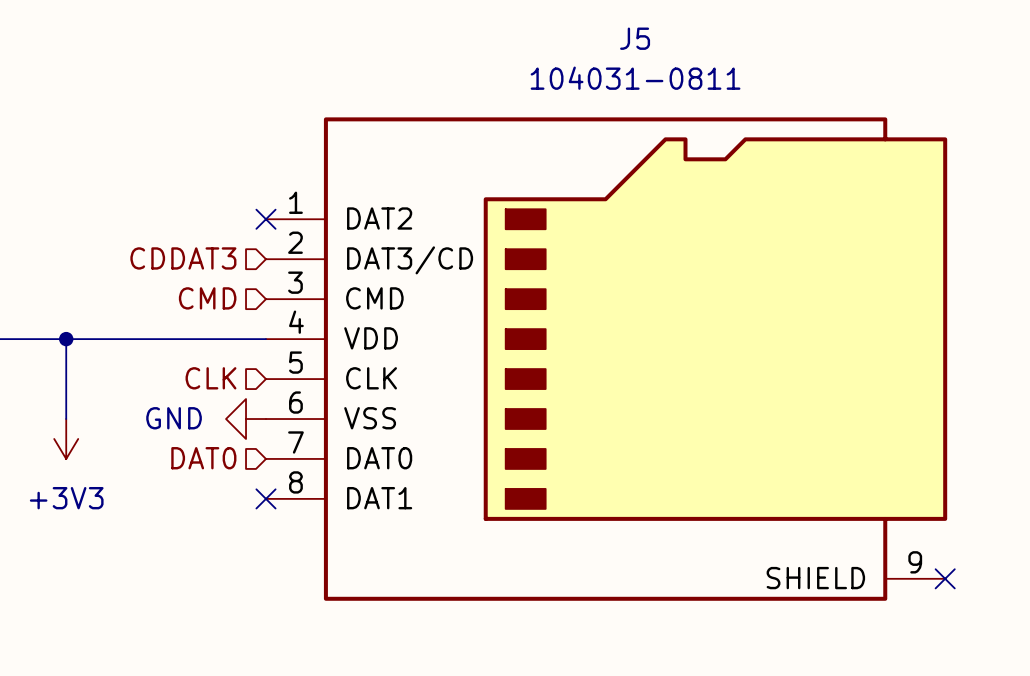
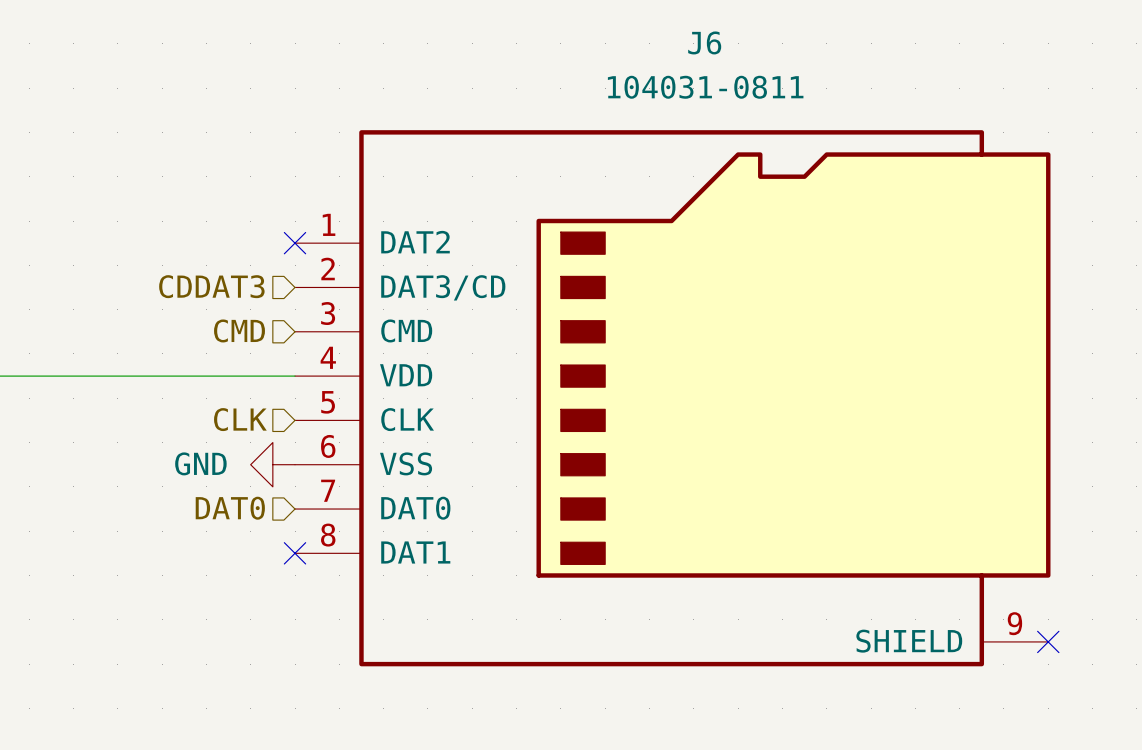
J5 name: J5 (635, 38) -> J6 (704, 42)
wire: (66, 339) (66, 419) -> none
junction: (66, 339) -> none
power symbol: +3V3 (66, 438) -> none

